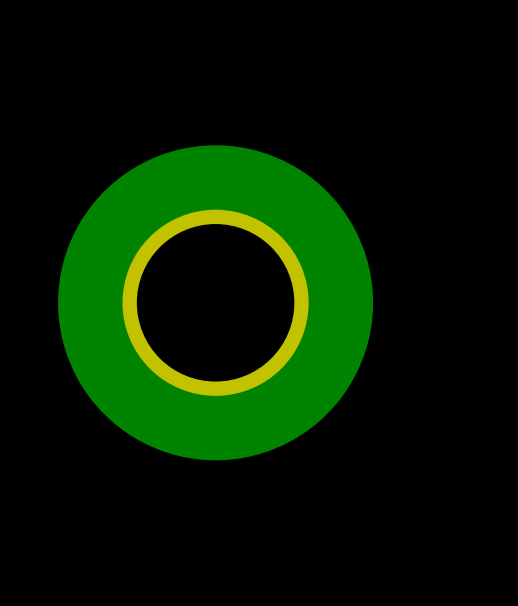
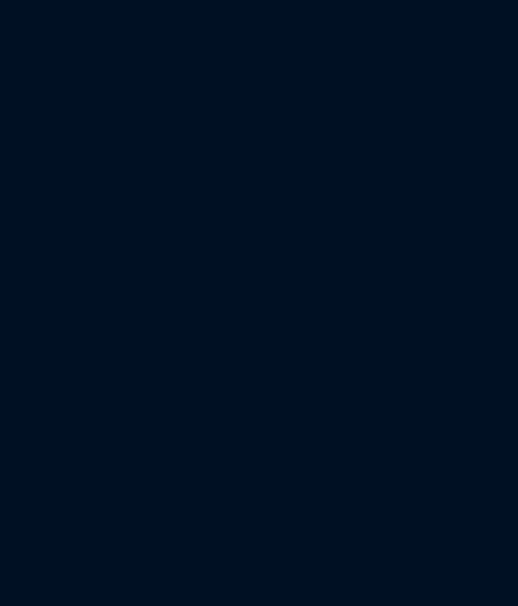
part: (215, 302) -> none

